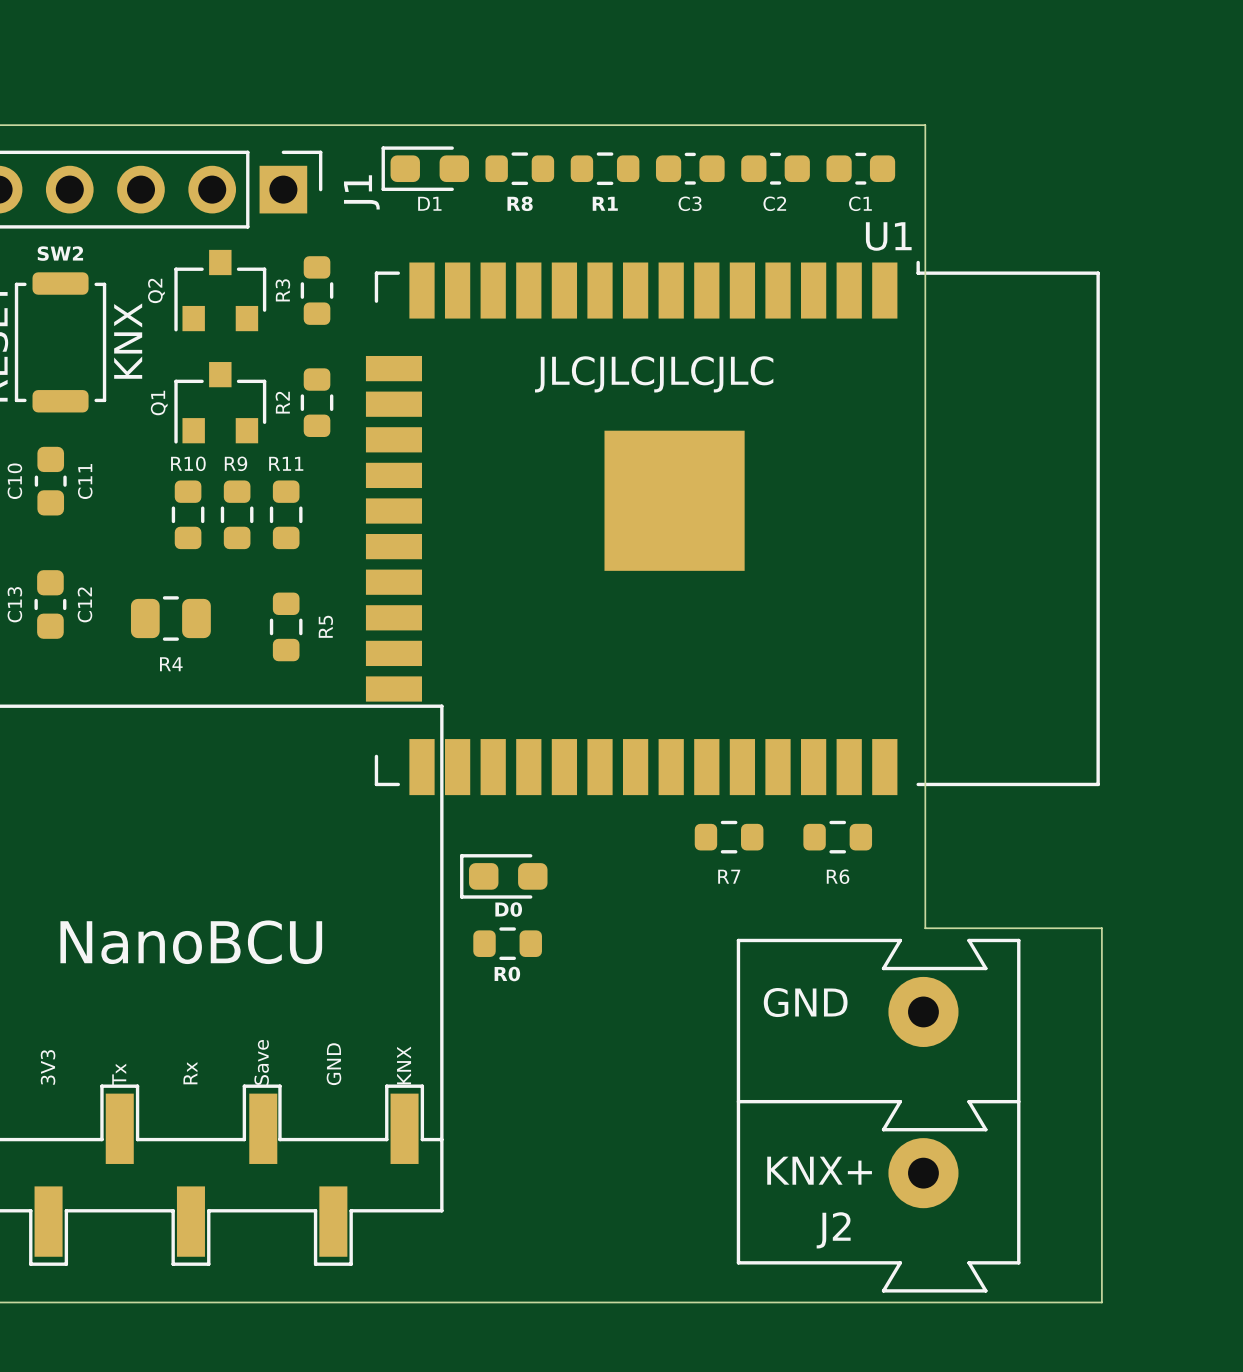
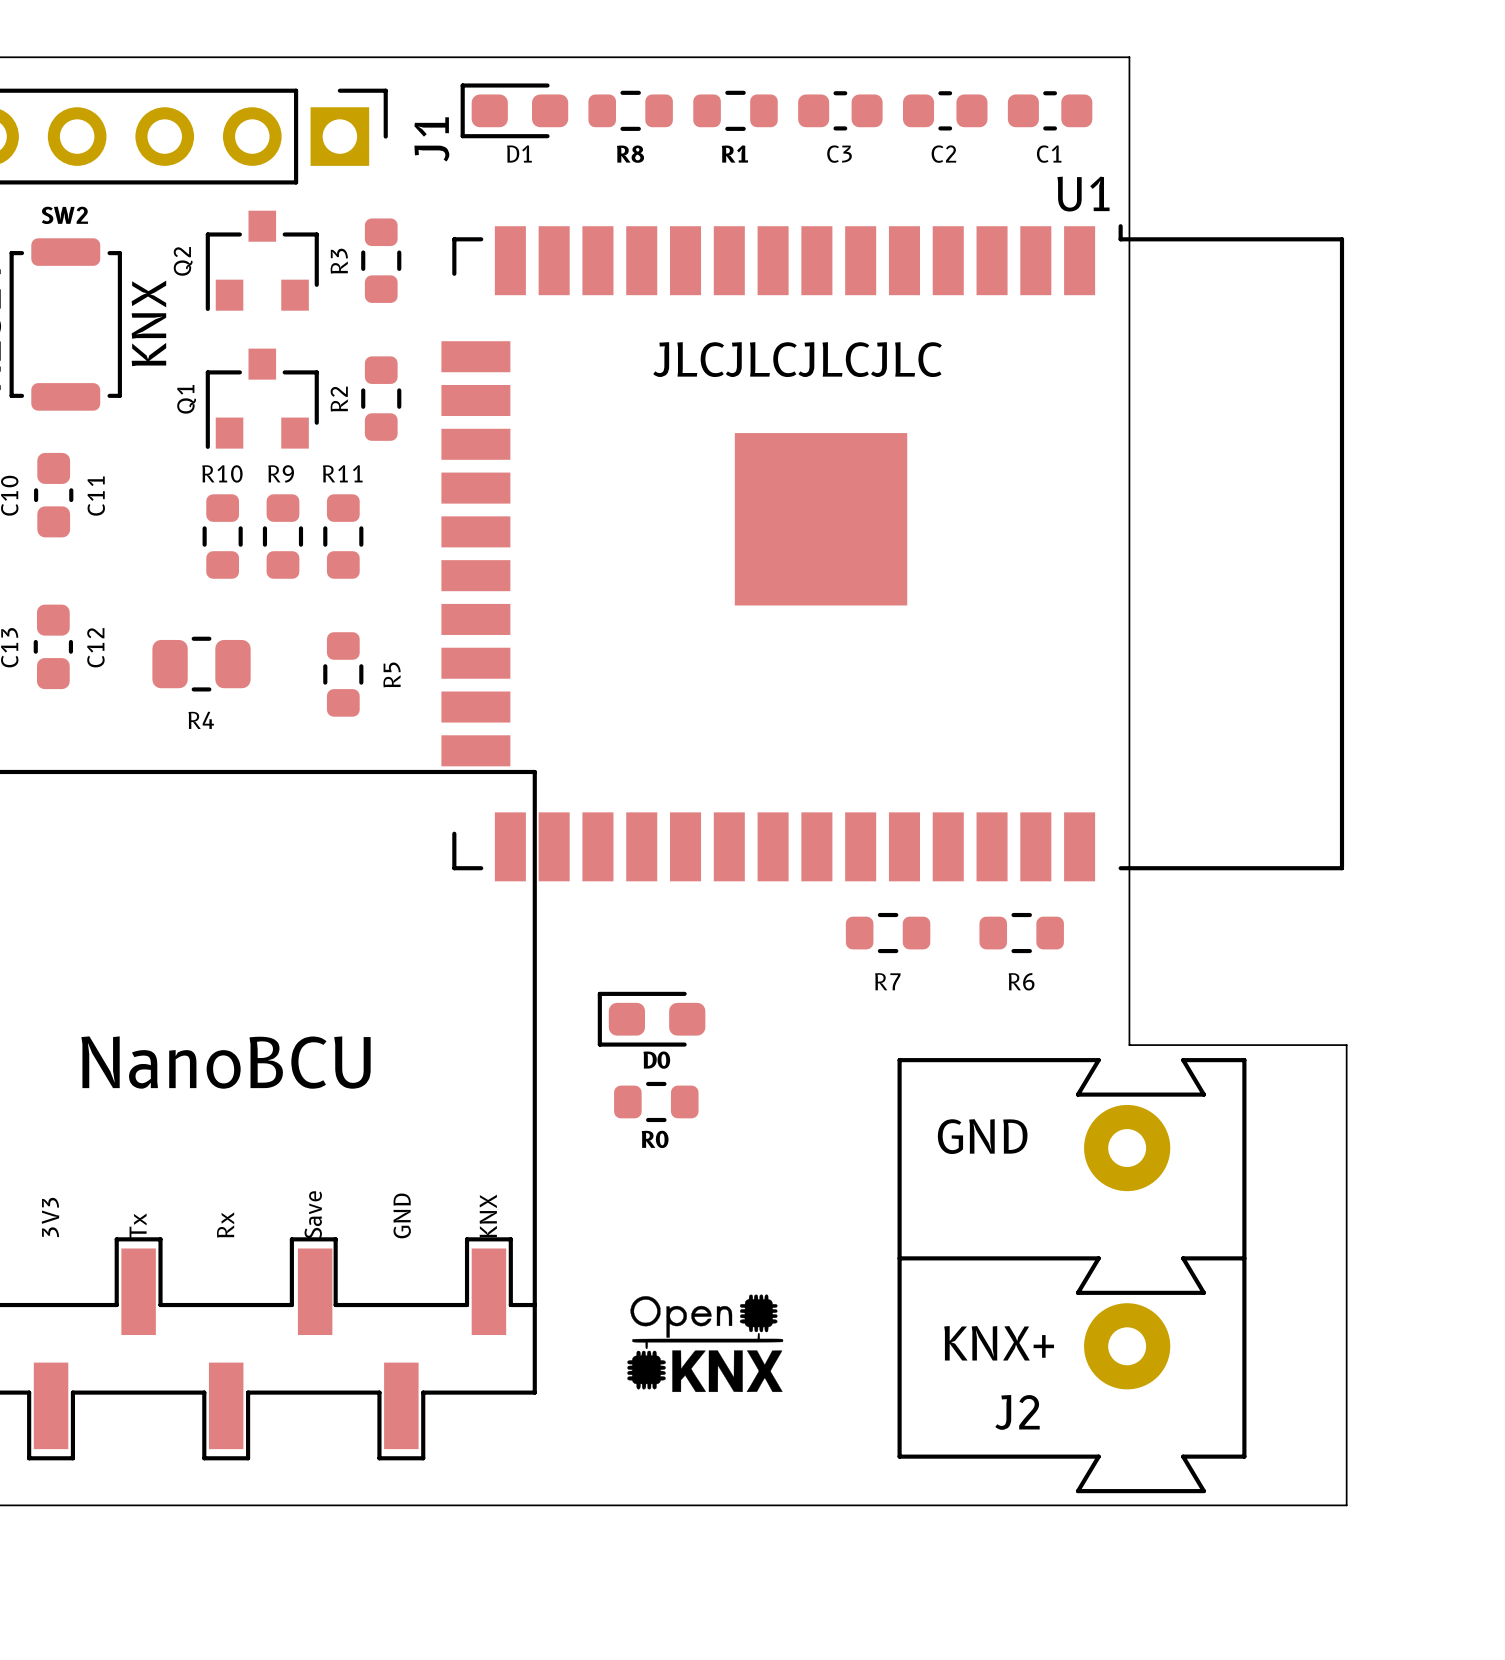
D0 position: (503, 876) -> (651, 1019)
R0 position: (507, 943) -> (656, 1101)
drawing: none -> [627, 1294, 784, 1393]

